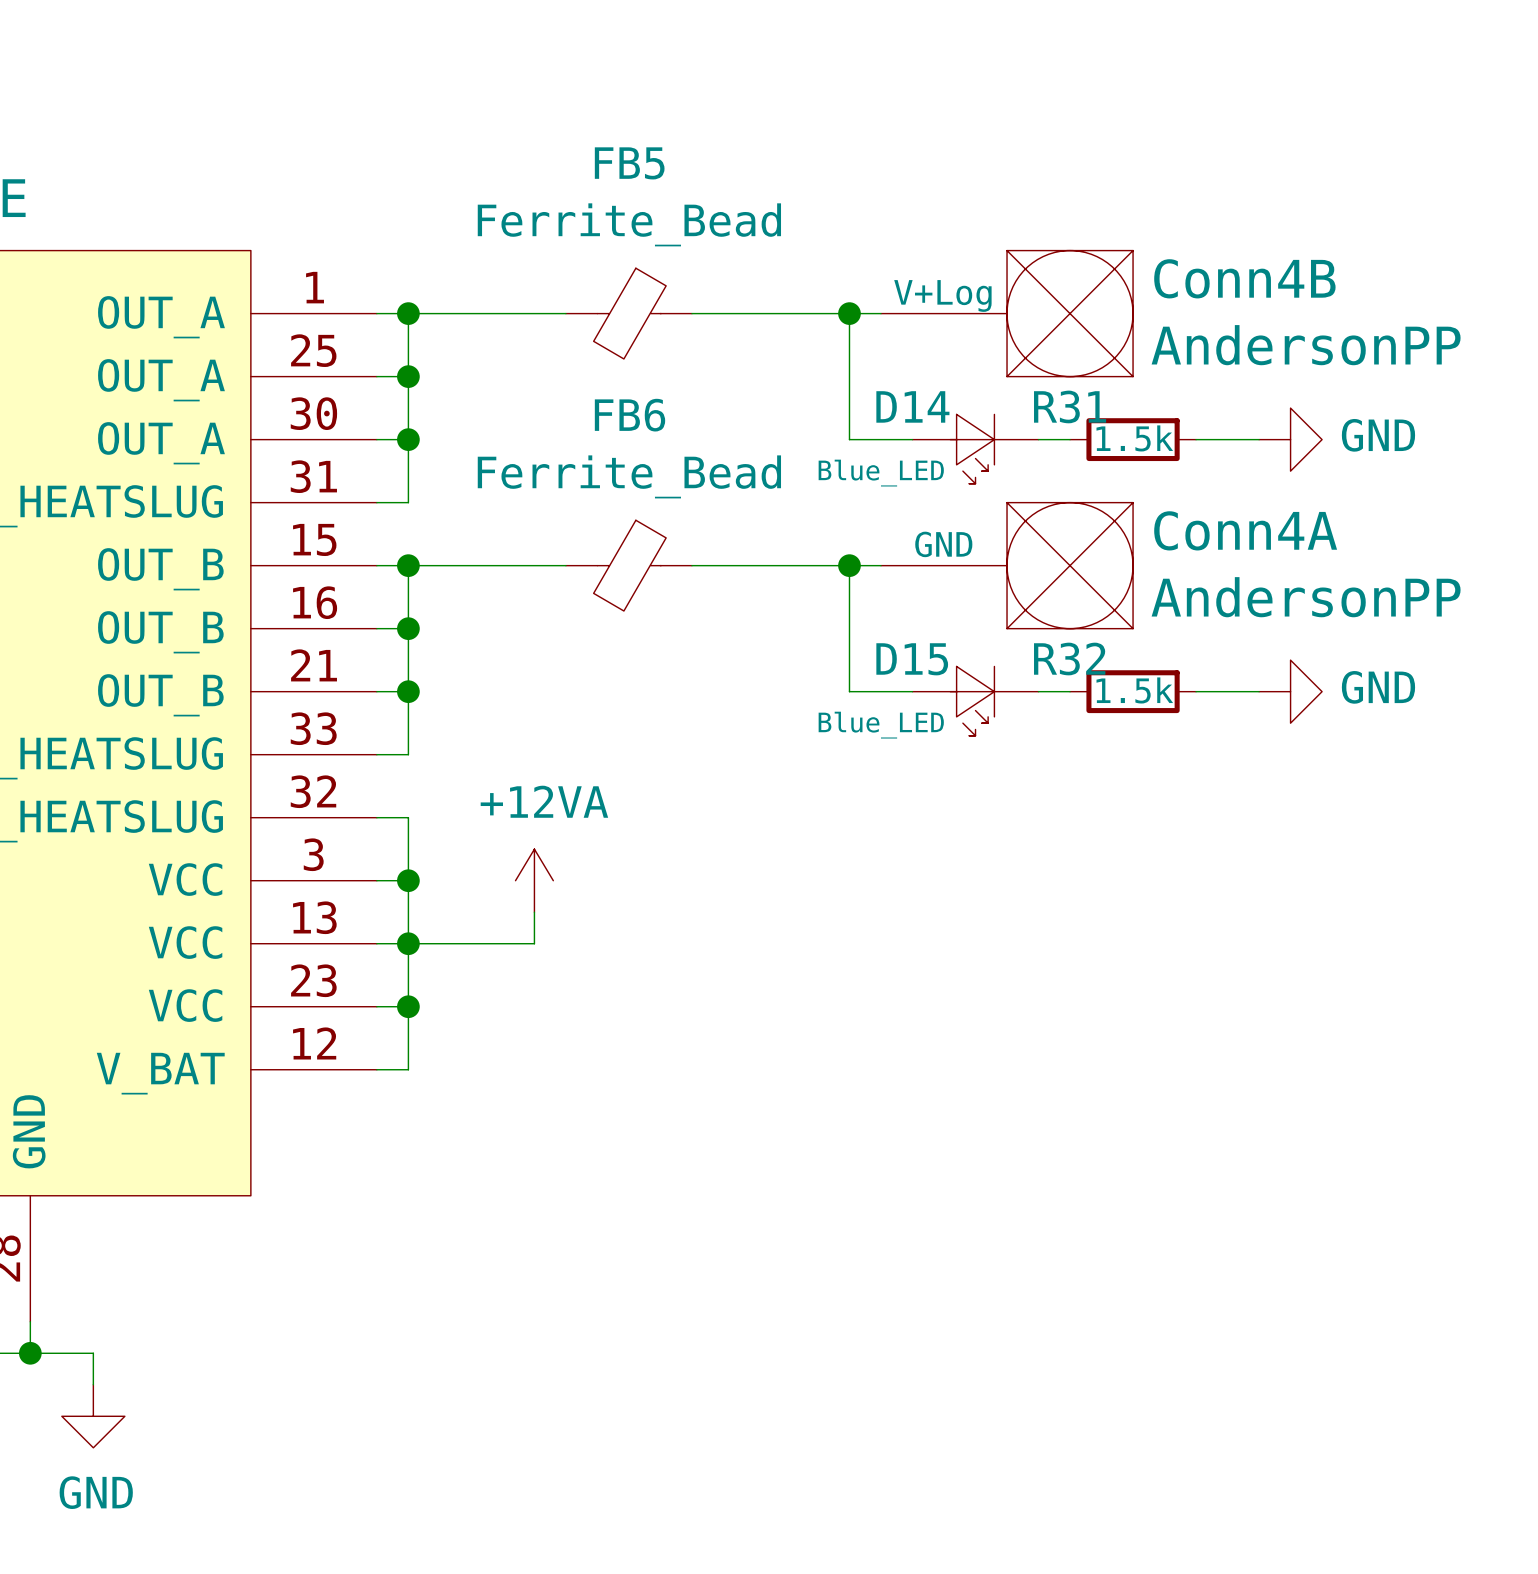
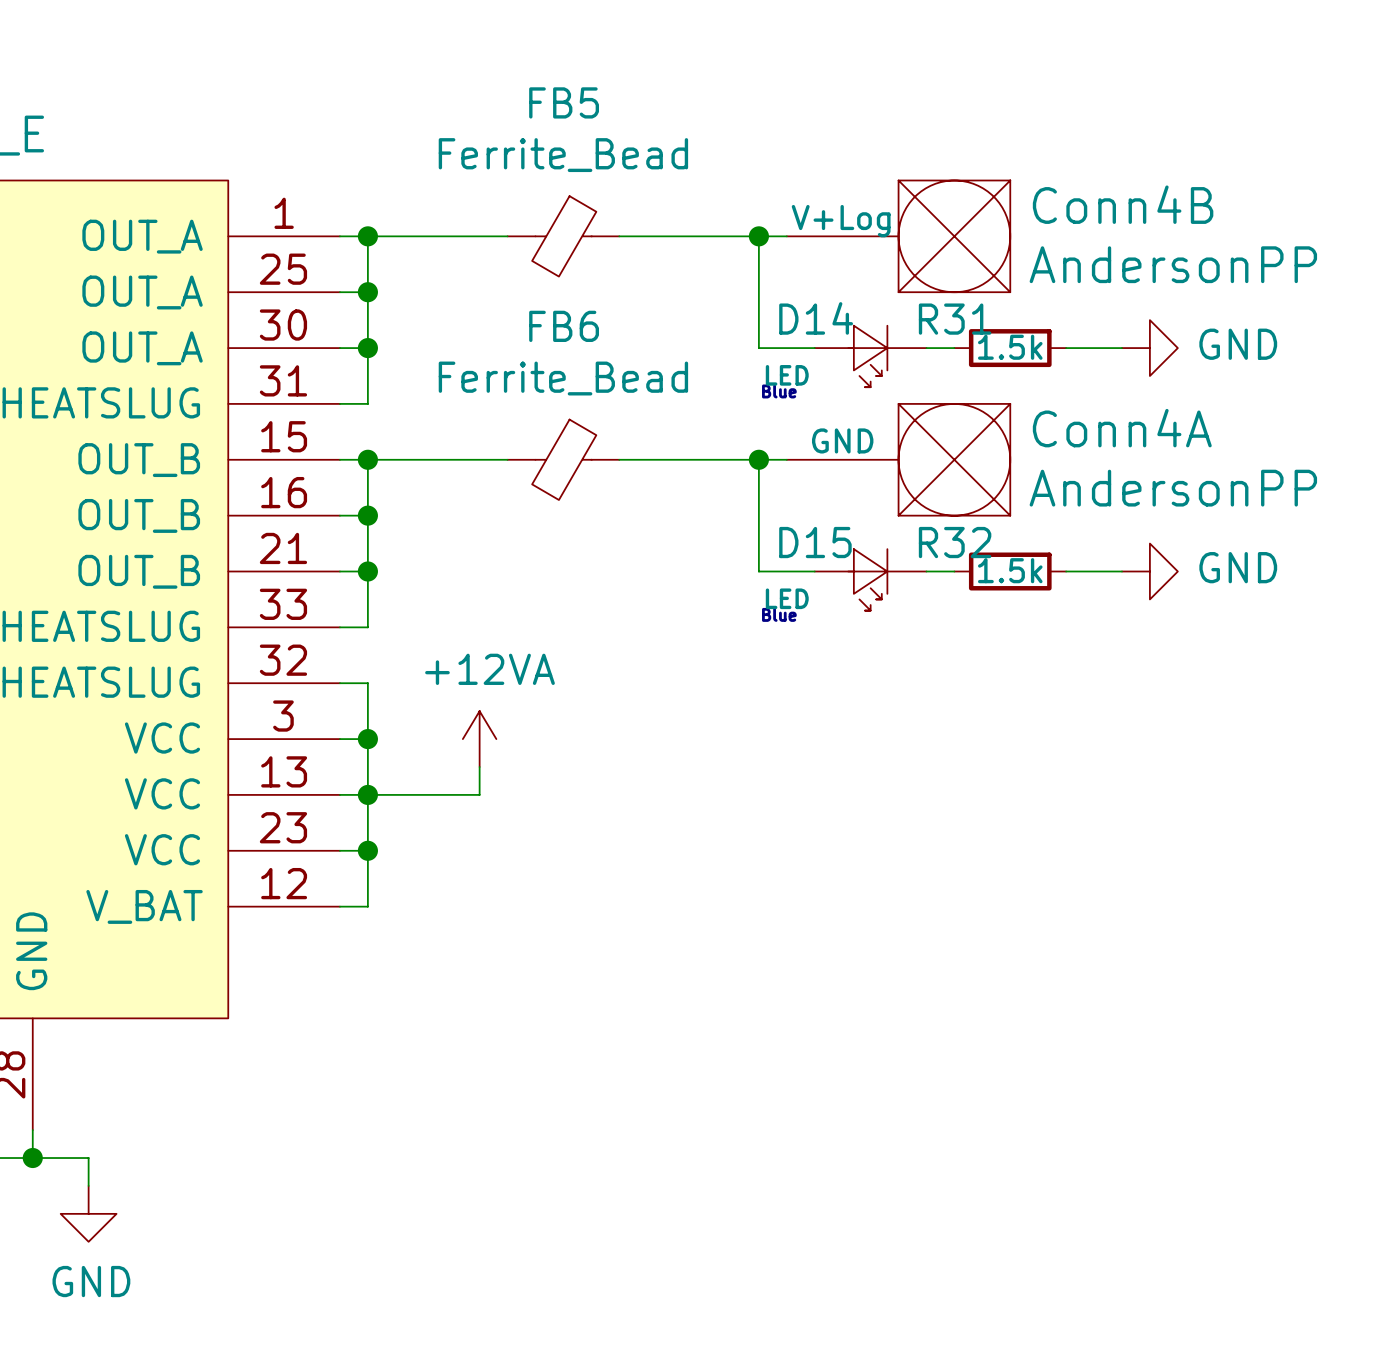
D14 value: Blue_LED (881, 473) -> LED (787, 375)
text: none -> Blue (779, 391)
D15 value: Blue_LED (881, 725) -> LED (787, 598)
text: none -> Blue (779, 614)

